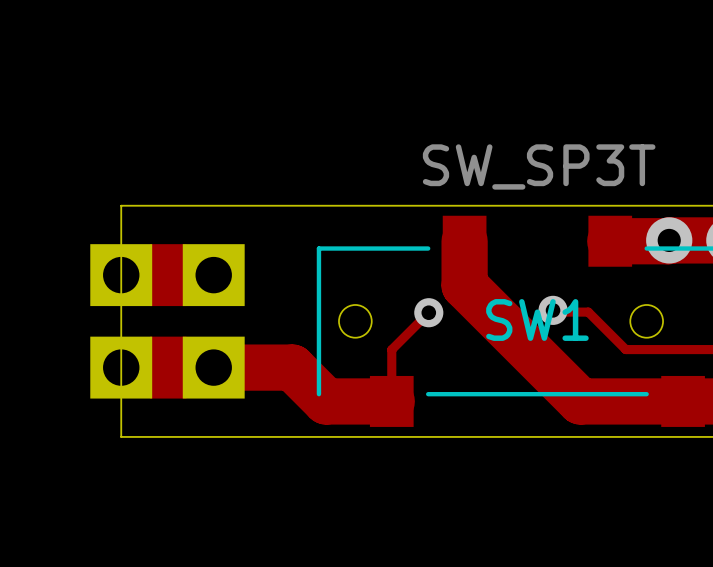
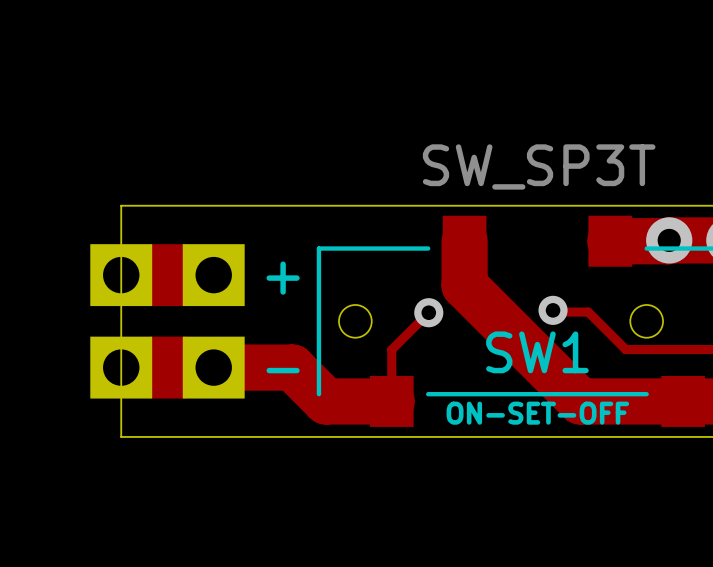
text: none -> + (283, 278)
SW1 name position: SW1 (537, 319) -> SW1 (537, 352)
text: none -> - (283, 370)
text: none -> ON-SET-OFF (537, 413)

